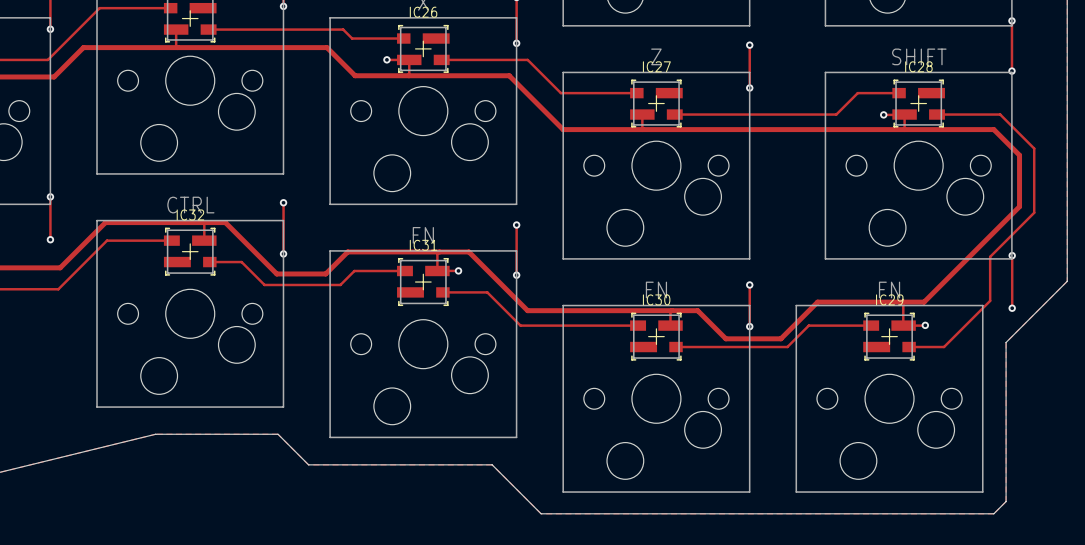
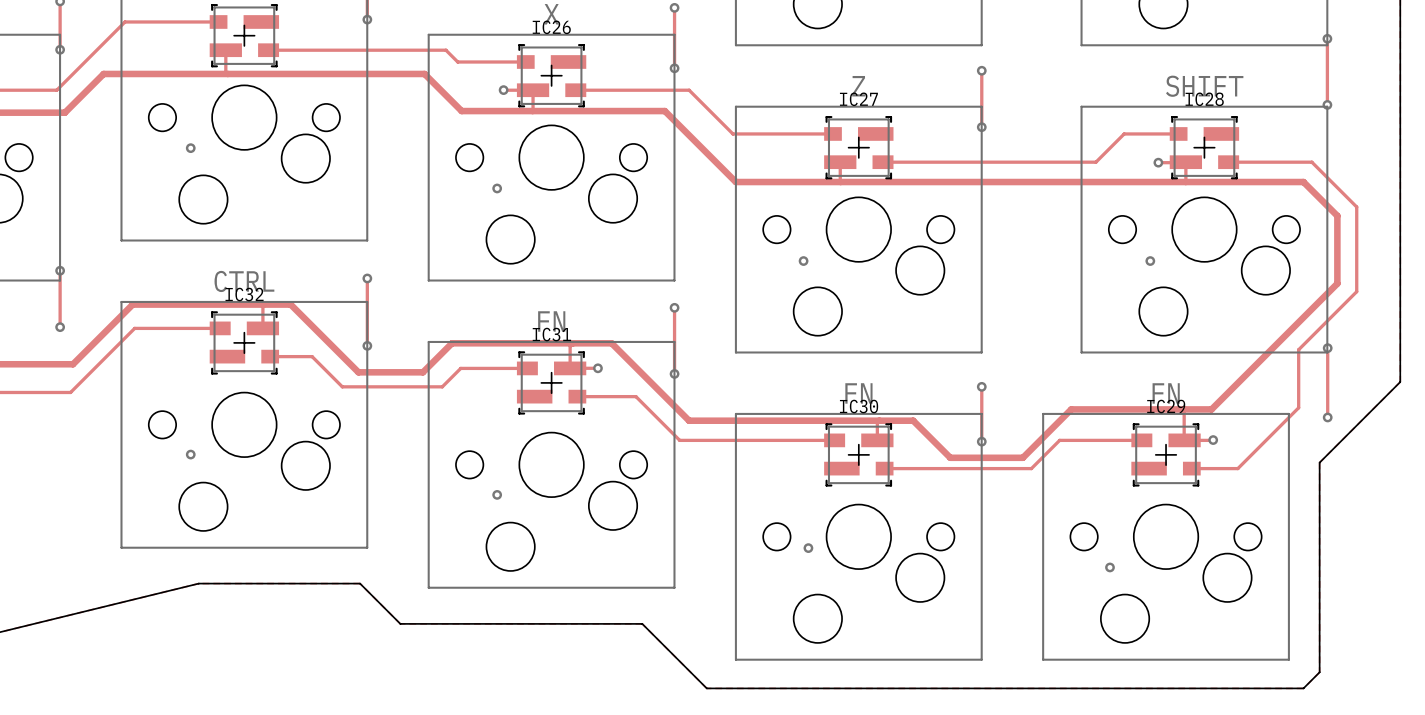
via: none -> (190, 148)
via: none -> (497, 188)
via: none -> (803, 261)
via: none -> (1150, 261)
via: none -> (190, 454)
via: none -> (497, 494)
via: none -> (808, 548)
via: none -> (1109, 567)

